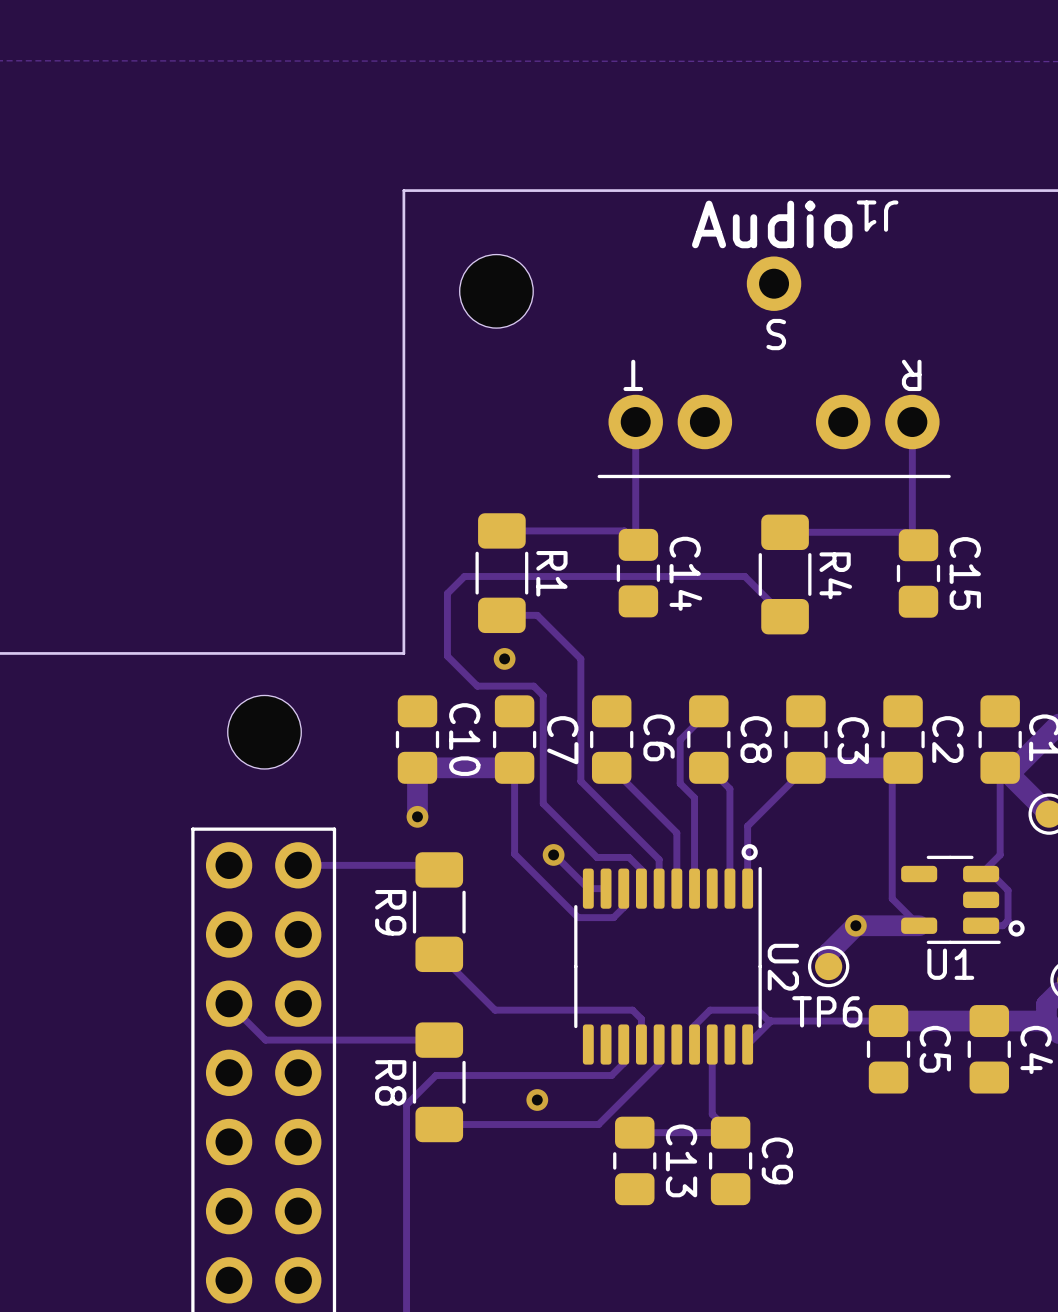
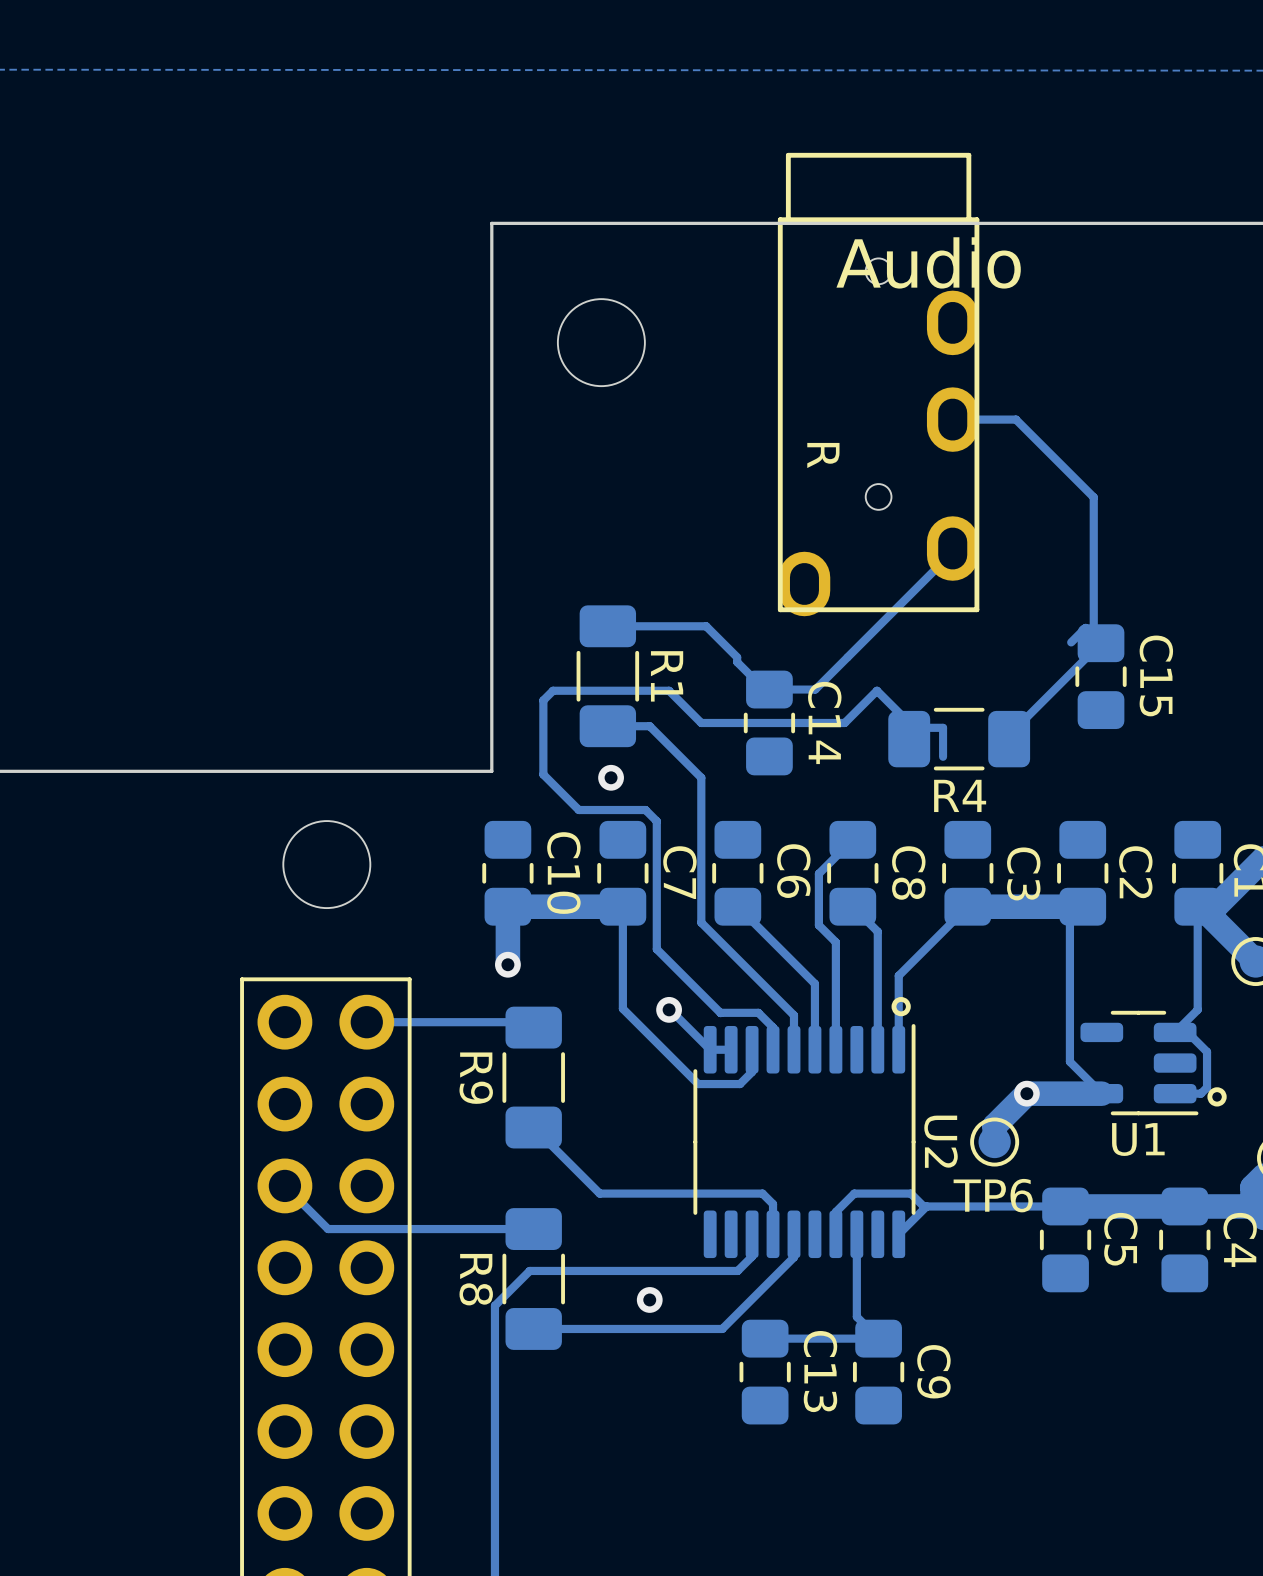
part: none -> (878, 384)
track: none -> (952, 419) (1015, 419) (1093, 497)
J1: (774, 367) -> none
track: (635, 422) (635, 542) -> none
track: (584, 530) (624, 530) (638, 544) -> (706, 626) (737, 657) (737, 662) (765, 690) (815, 689) (952, 552) (952, 548)
track: (905, 532) (785, 532) -> (1085, 627) (1071, 642)
track: none -> (1101, 643) (1009, 735) (1009, 739)
C14 position: (638, 573) -> (769, 722)
R4 rotation: 0° (785, 574) -> 90° clockwise (959, 739)
track: (455, 585) (464, 576) (744, 576) (785, 616) -> (553, 690) (669, 690) (701, 722) (844, 722) (876, 690) (914, 727) (943, 727) (943, 756)

